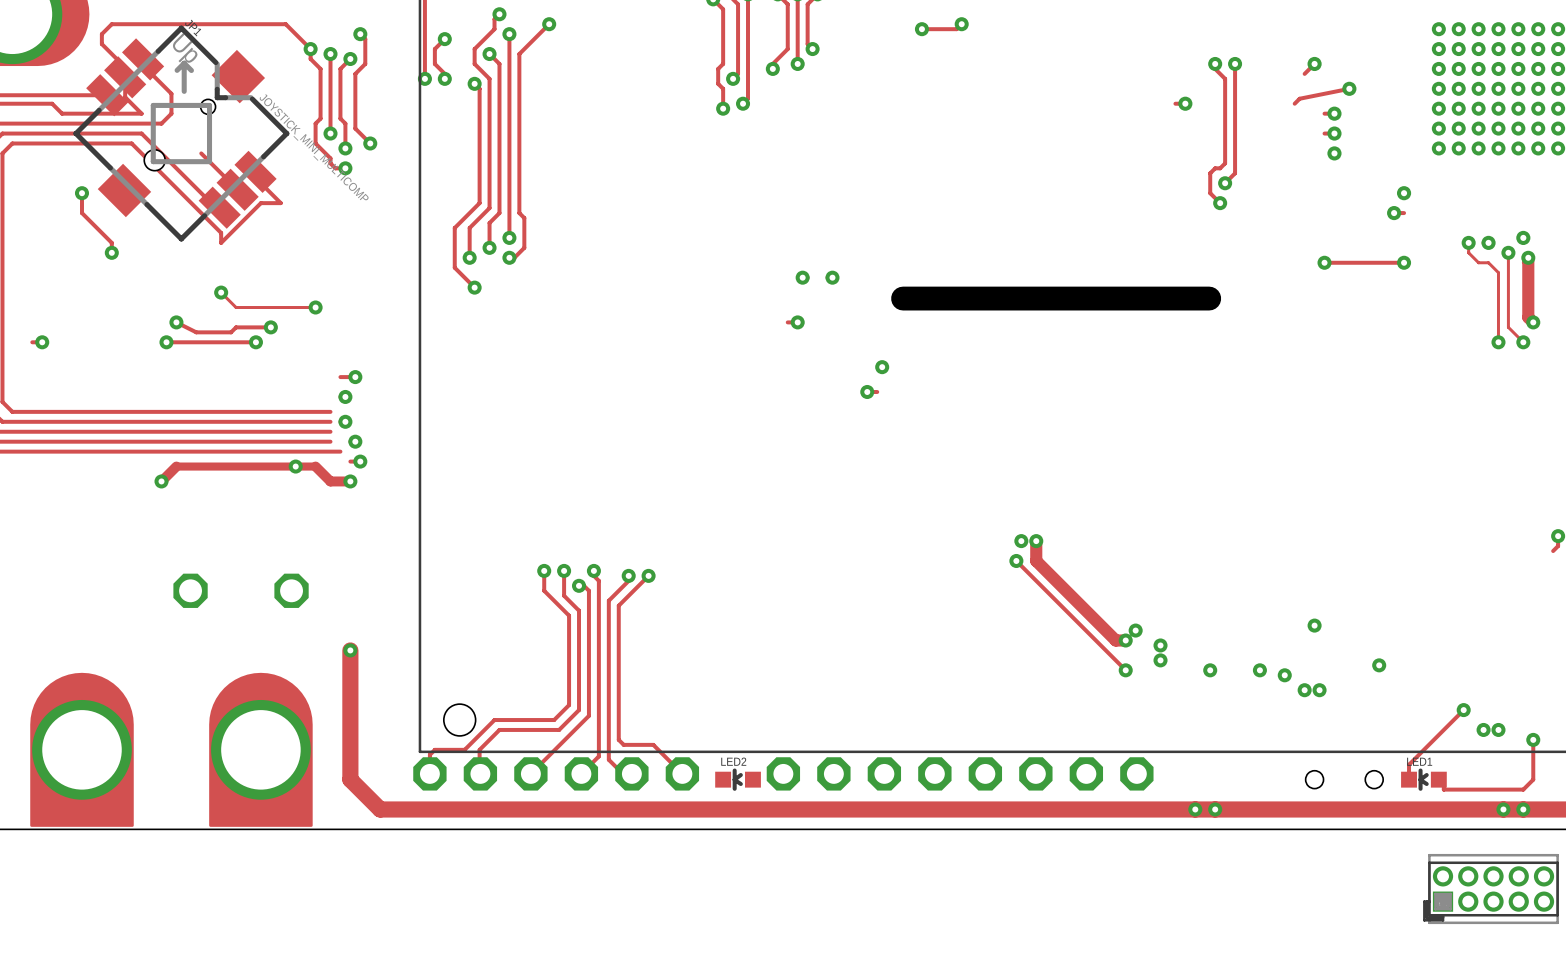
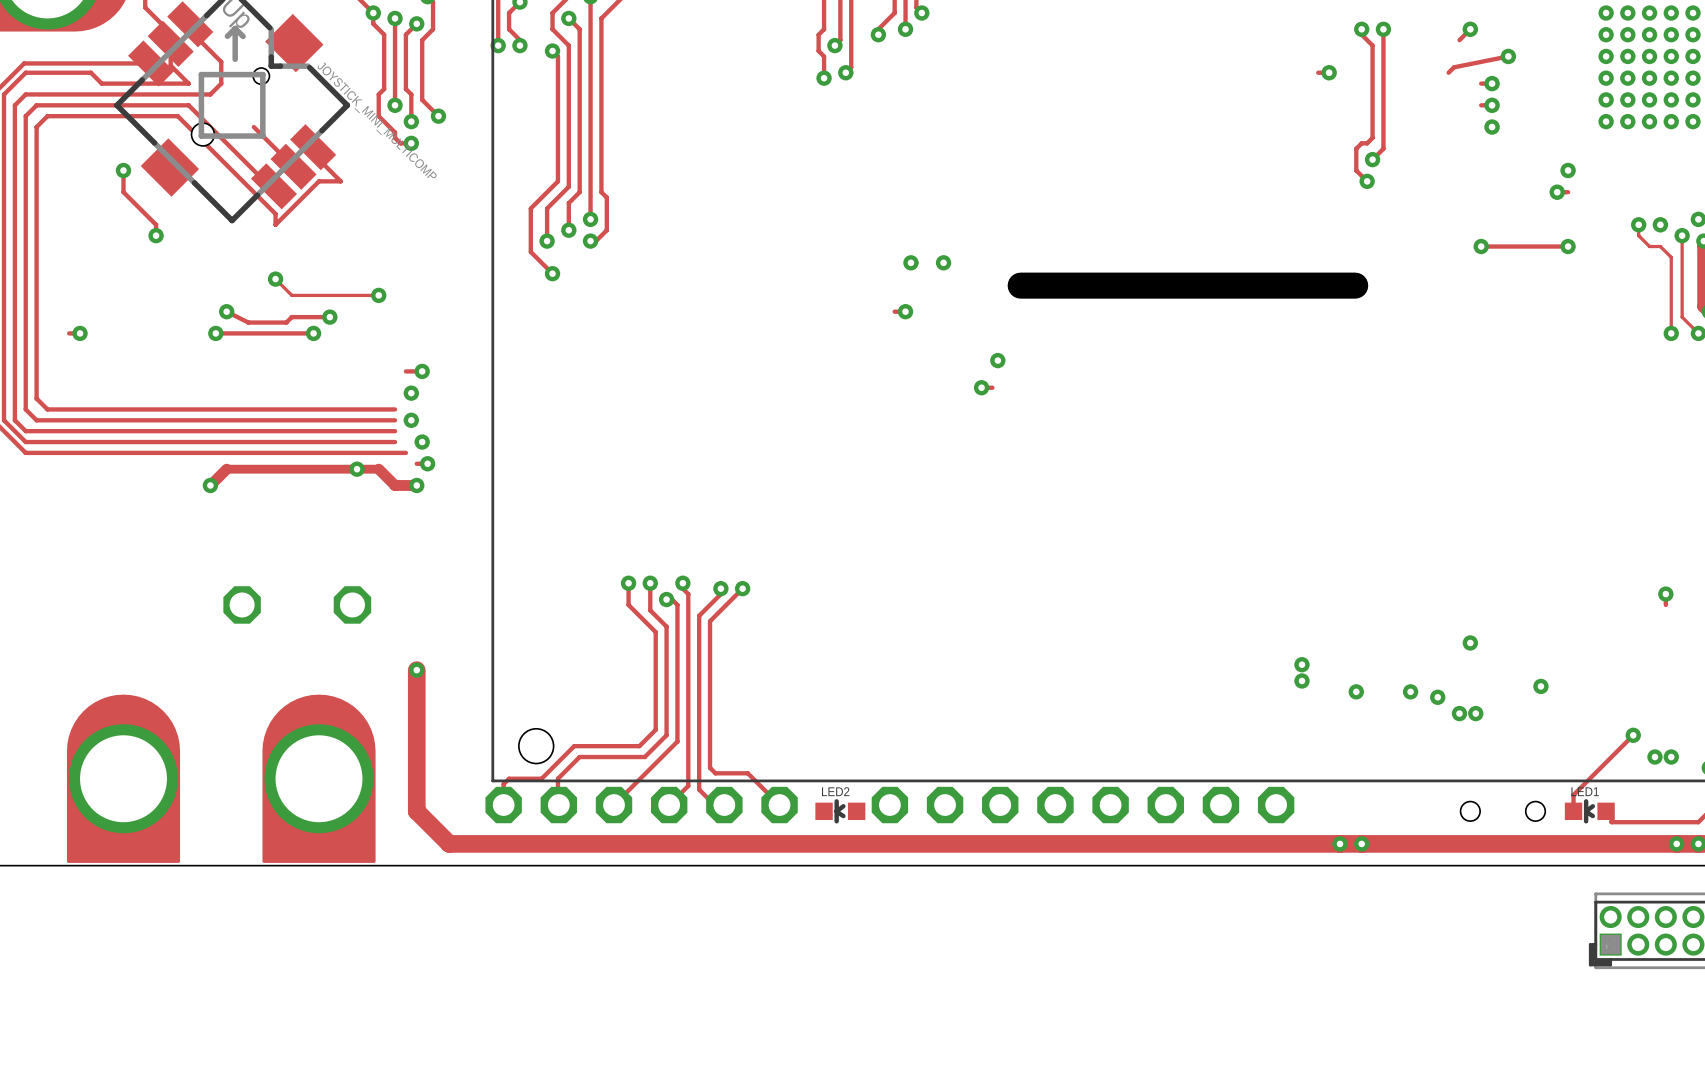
via: (1021, 541) -> none
track: (1036, 541) (1036, 560) (1115, 640) (1125, 640) -> none
via: (1036, 541) -> none
track: (1016, 560) (1125, 670) -> none
via: (1016, 560) -> none
track: none -> (1665, 594) (1665, 604)
via: none -> (1665, 594)
via: (1135, 630) -> none
via: (1125, 640) -> none
via: (1125, 670) -> none

